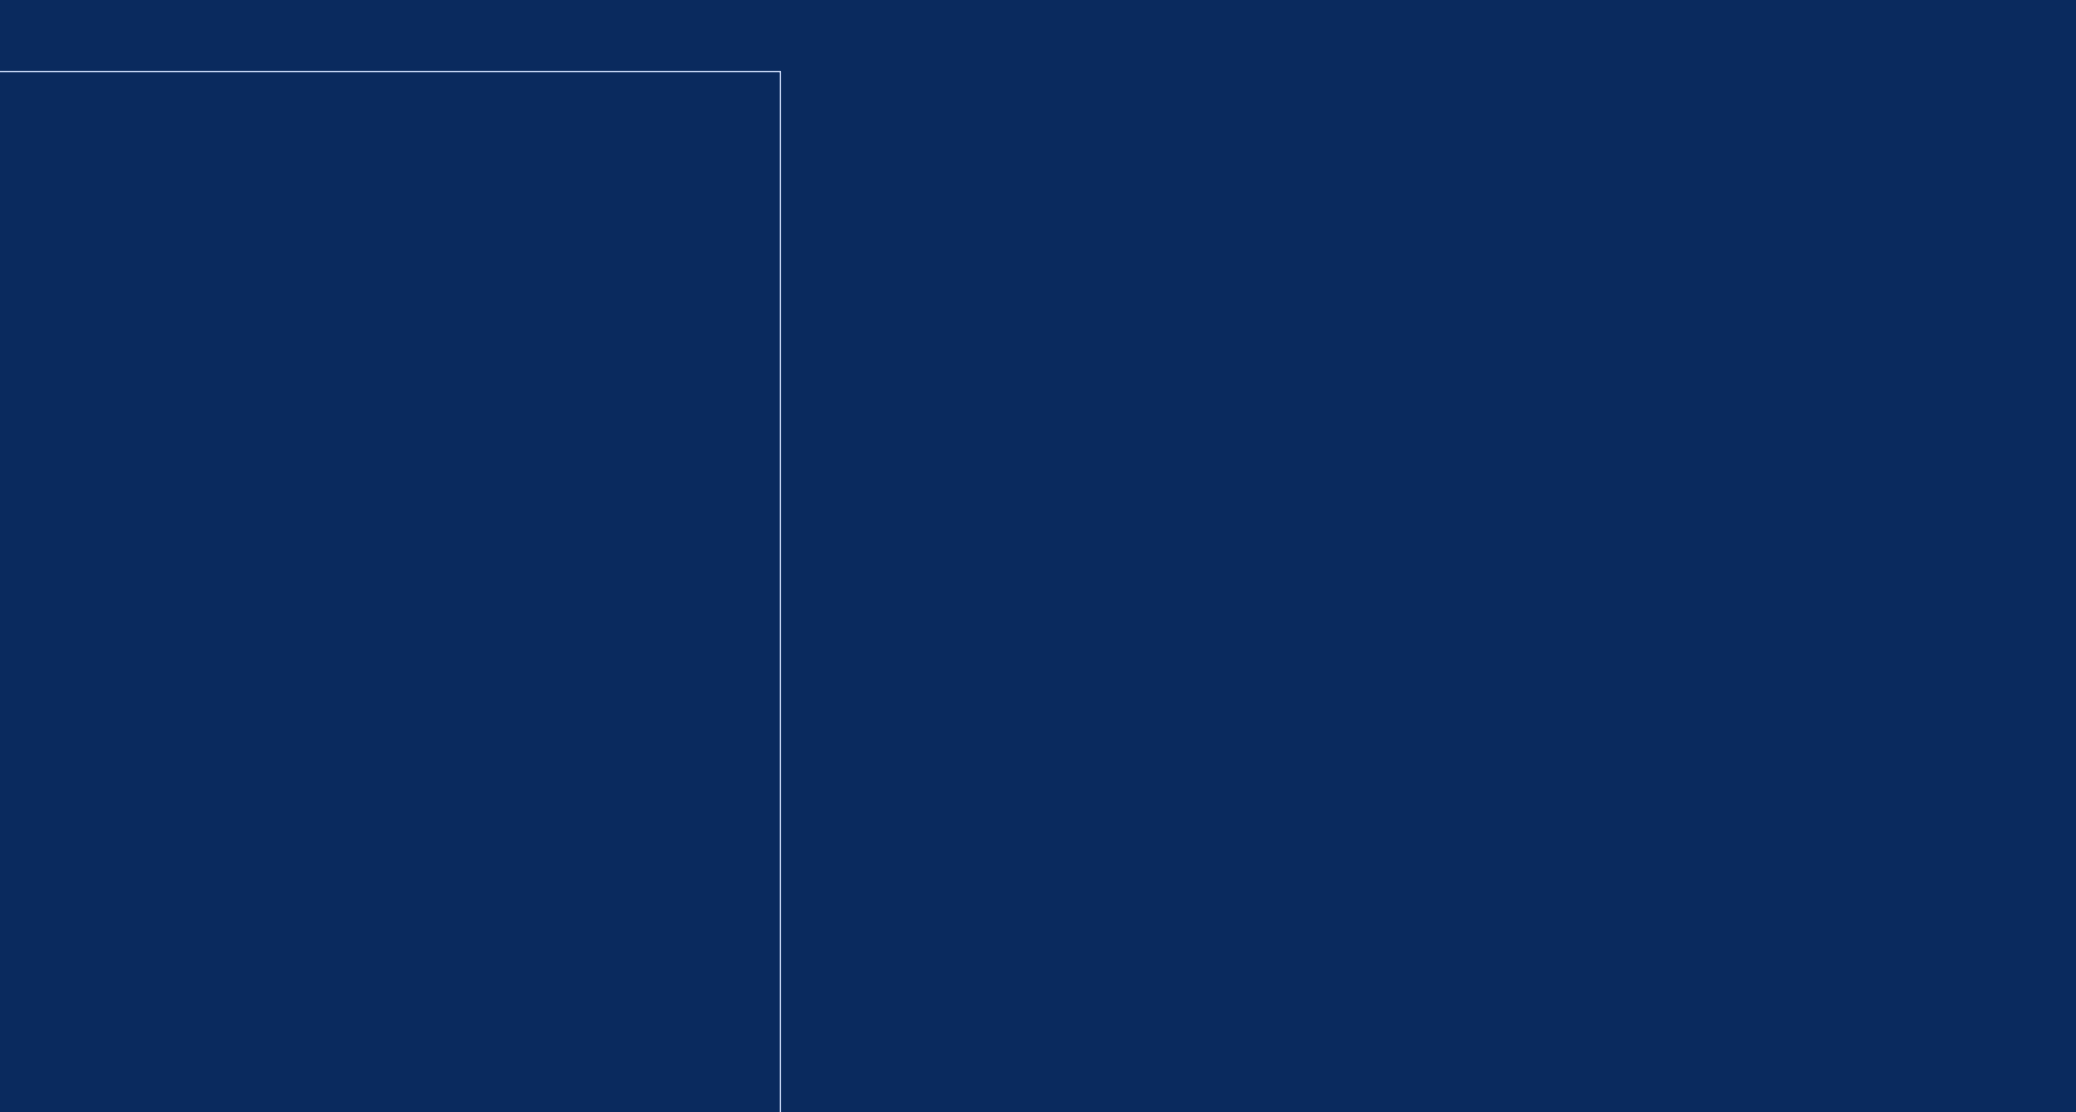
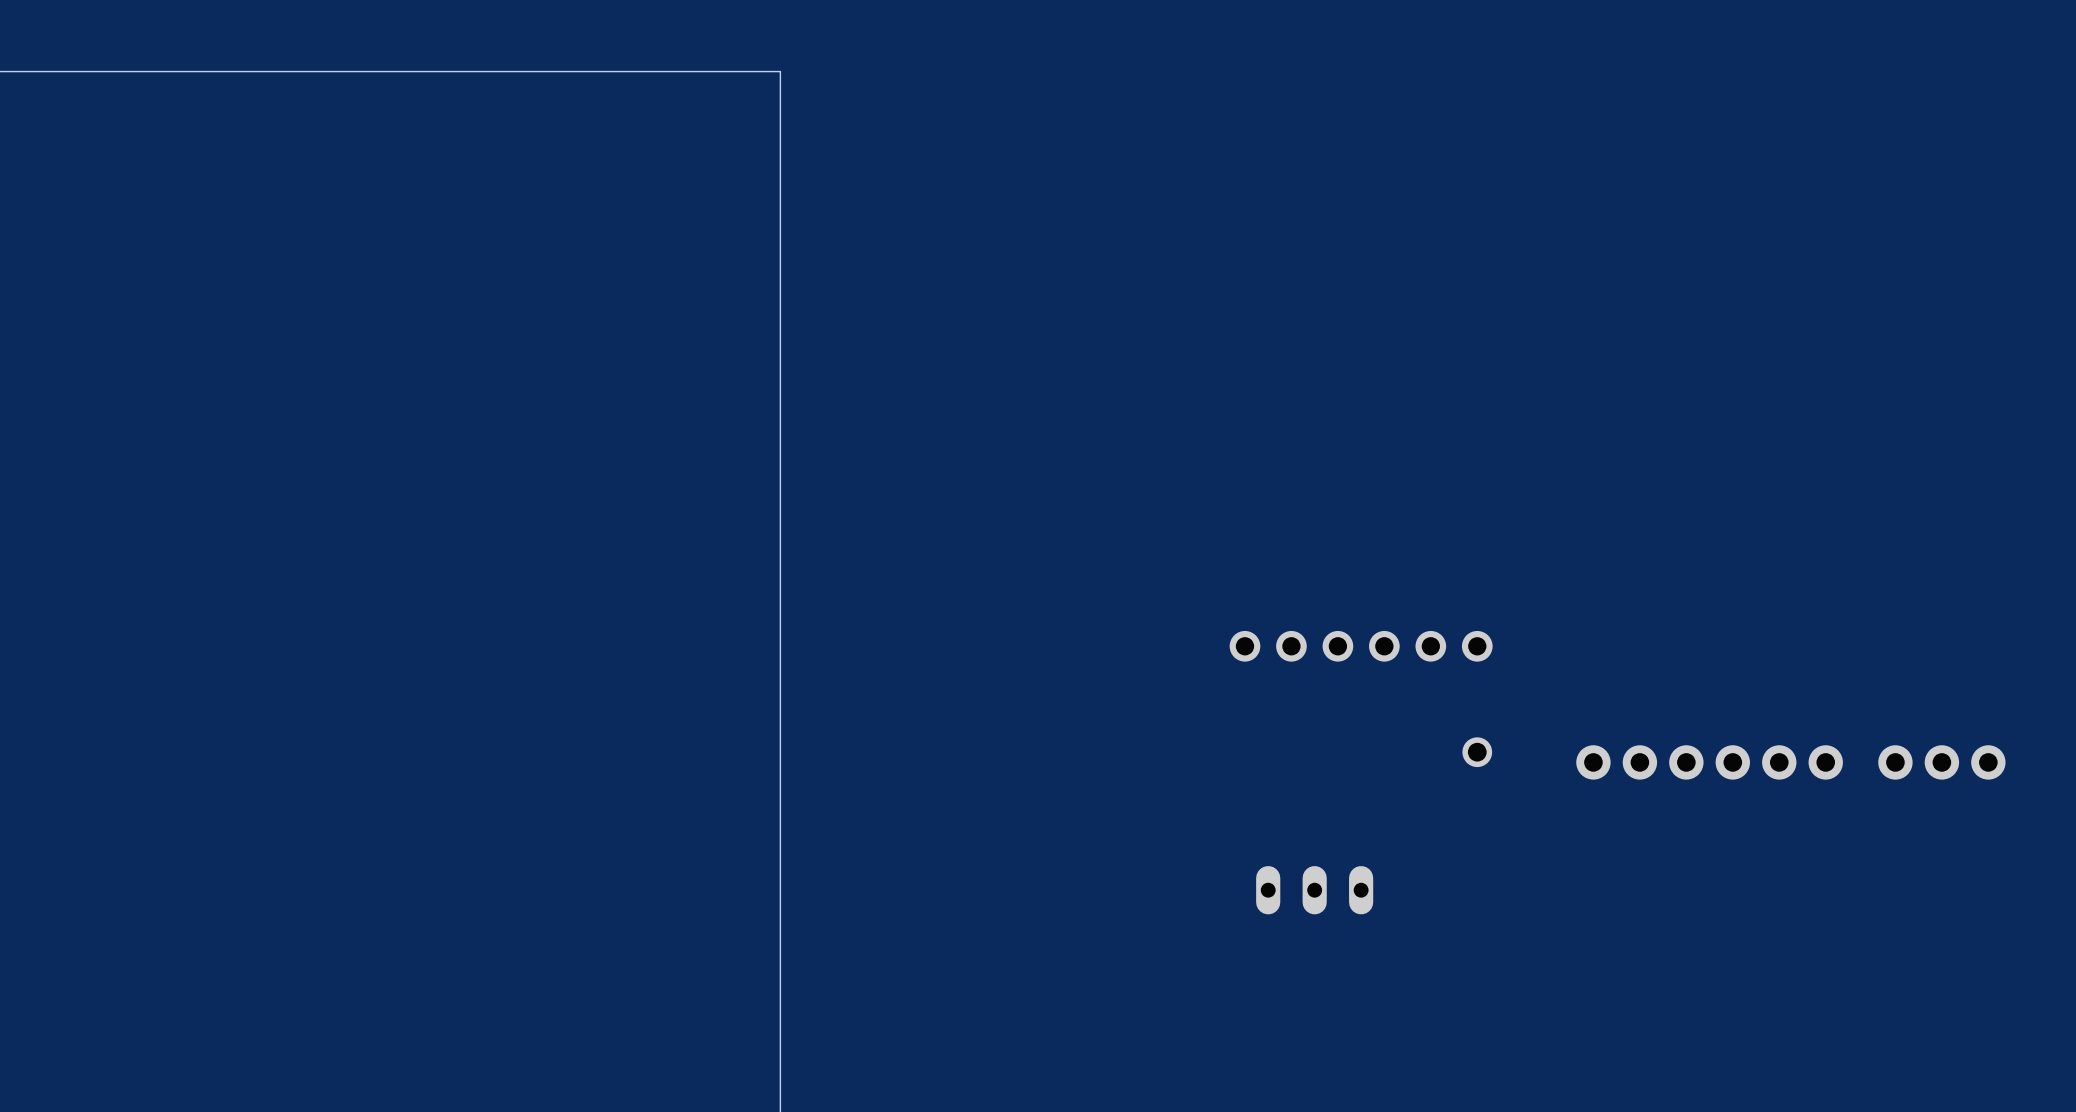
part: none -> (1361, 646)
part: none -> (1477, 752)
part: none -> (1709, 762)
part: none -> (1941, 762)
part: none -> (1314, 890)

